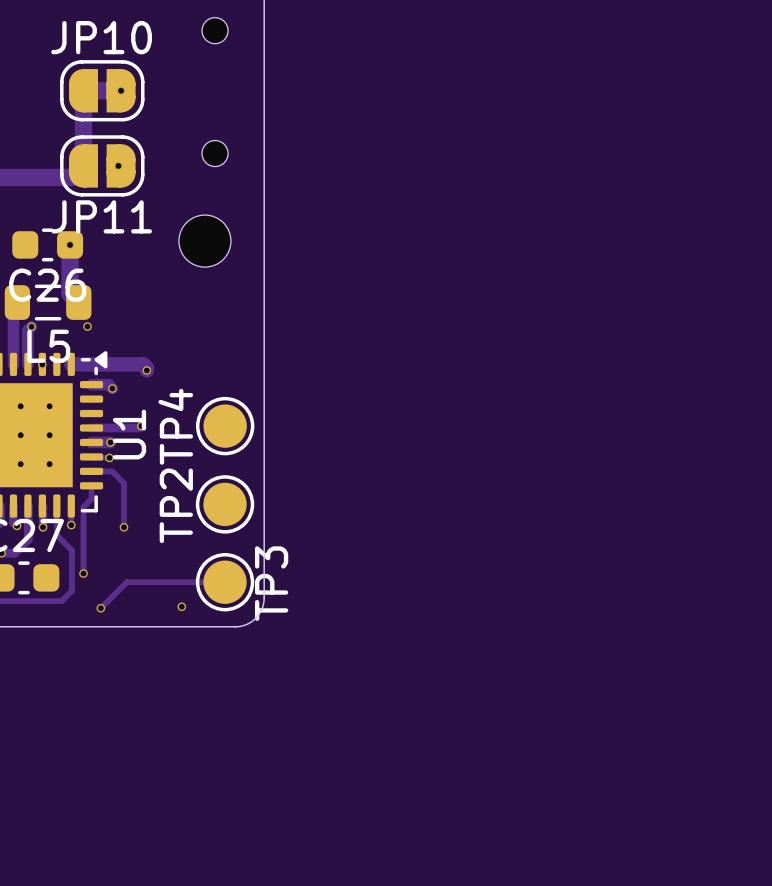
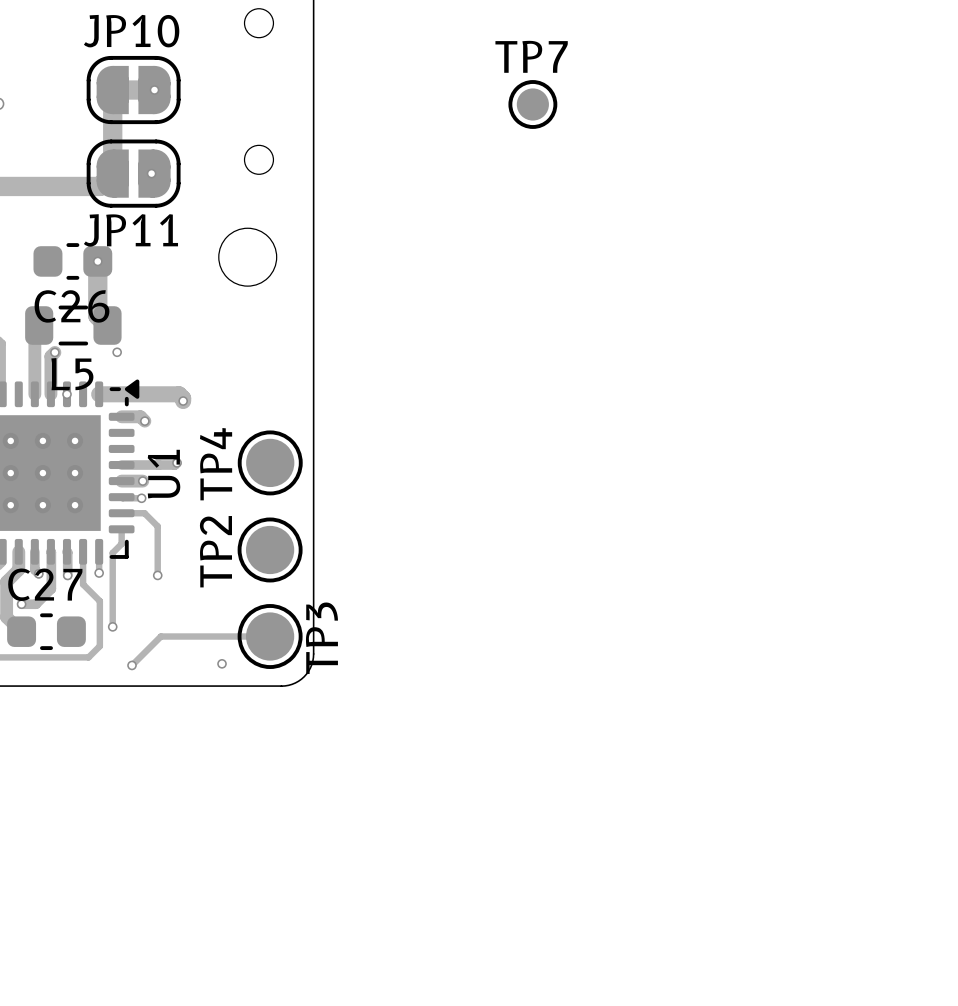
TP7: none -> (532, 104)

